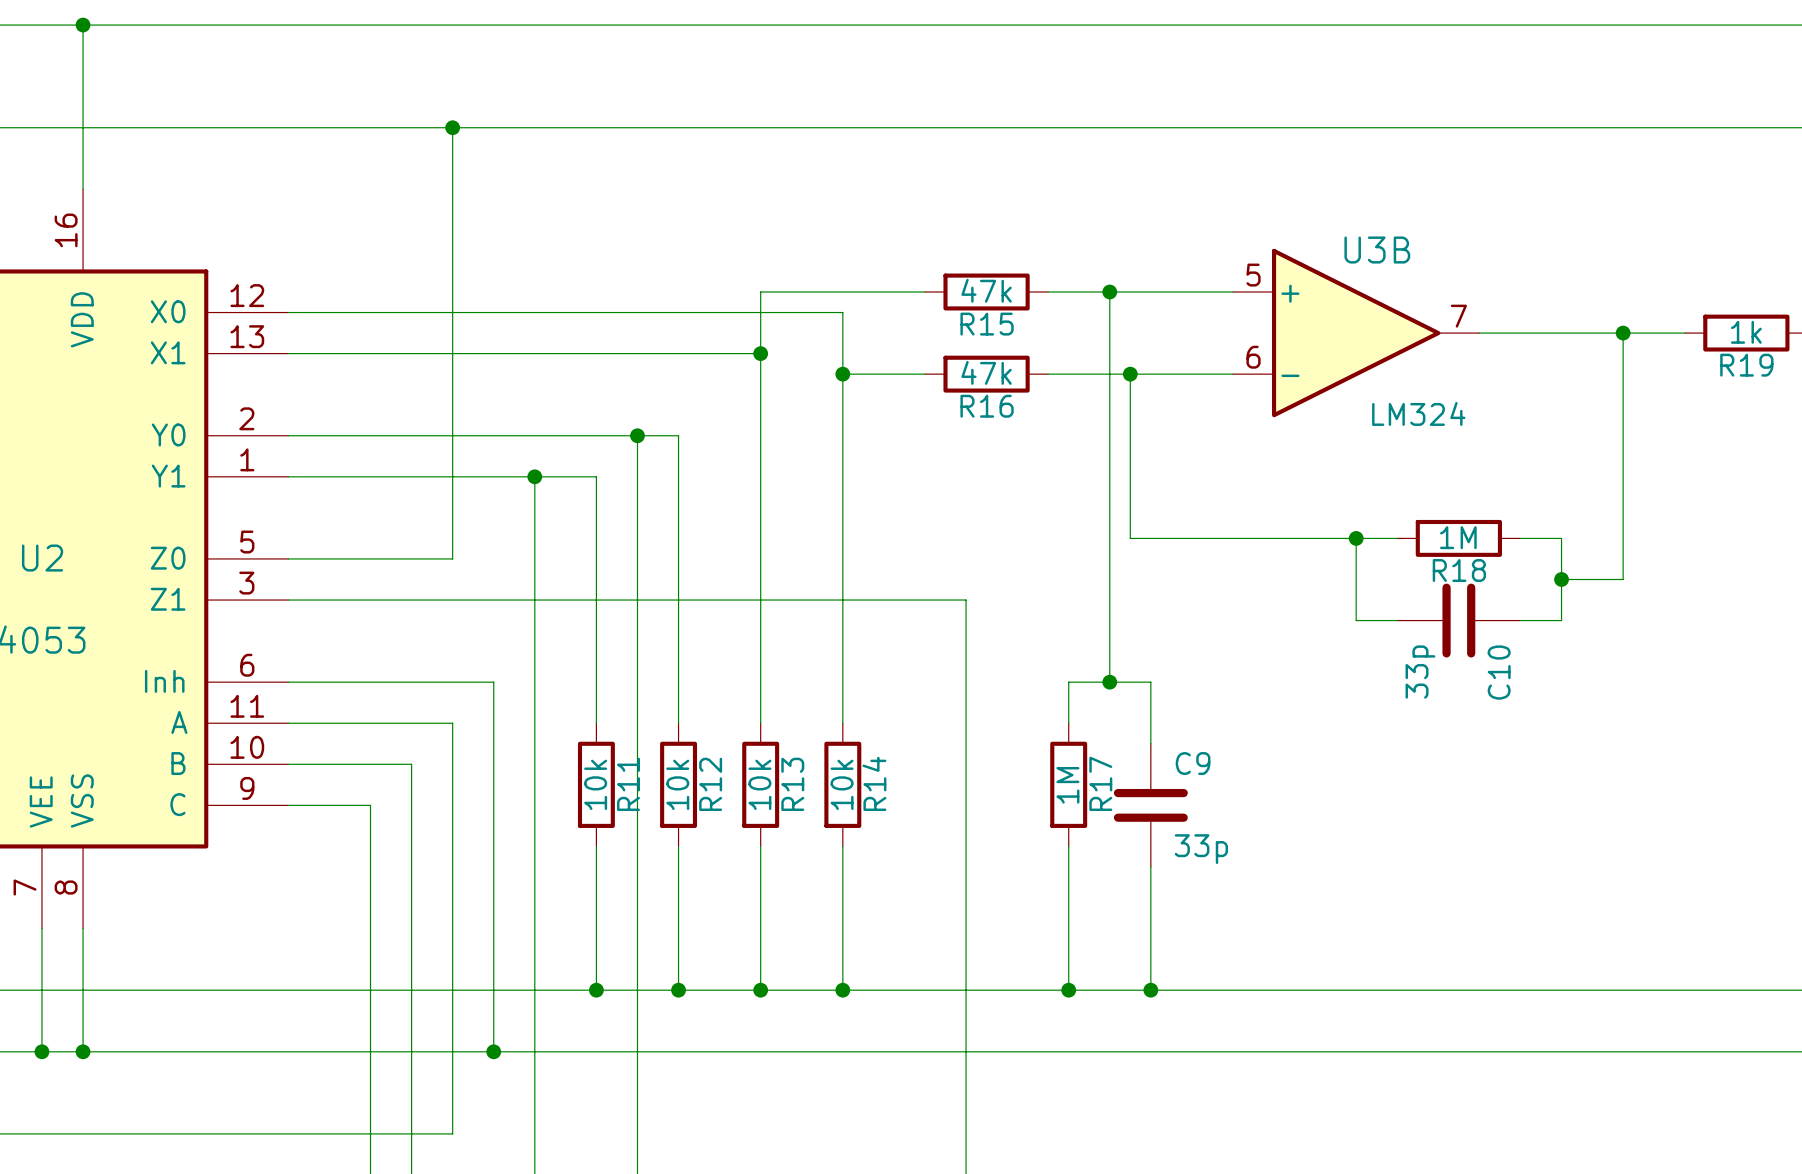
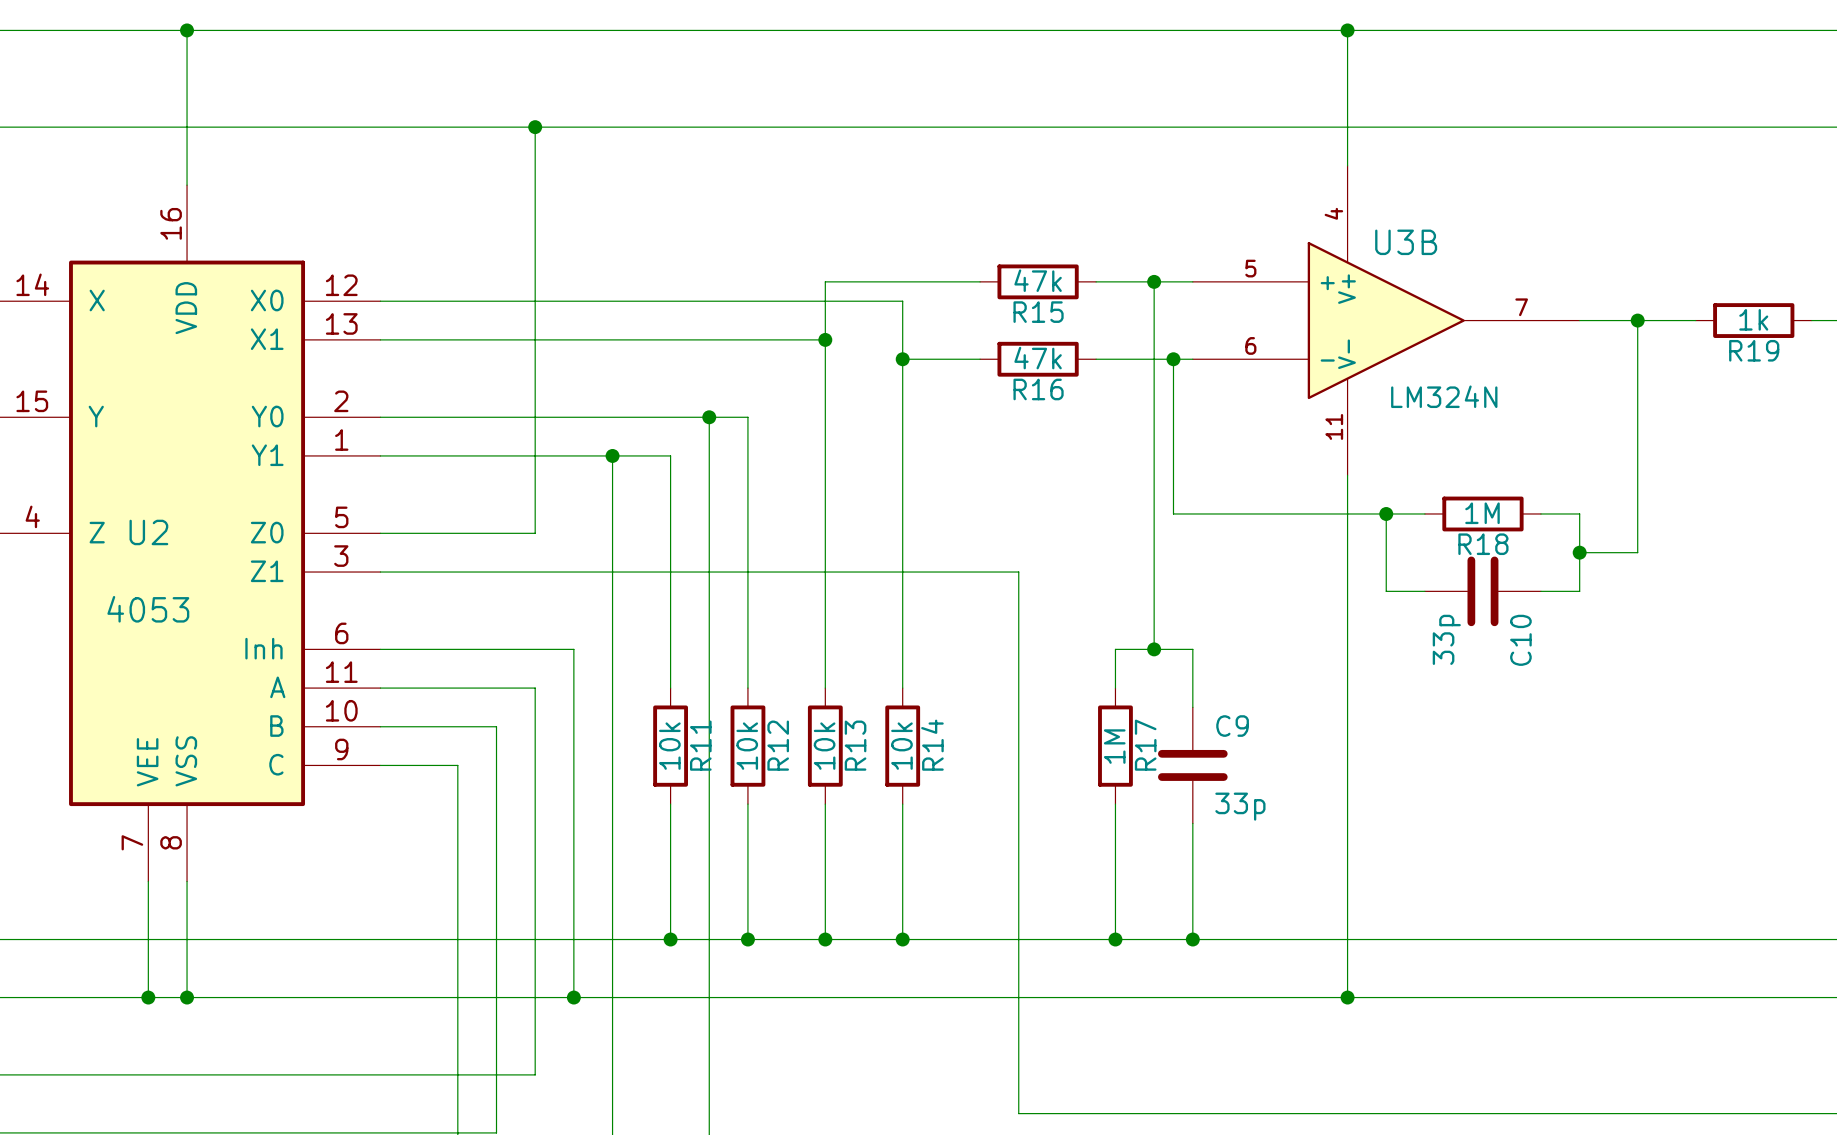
wire: none -> (1347, 30) (1347, 165)
junction: none -> (1347, 30)
U3B symbol: [1232, 248, 1480, 418] -> [1192, 165, 1580, 476]
U3B value: LM324 (1418, 413) -> LM324N (1444, 396)
wire: none -> (1347, 475) (1347, 997)
junction: none -> (1347, 997)

